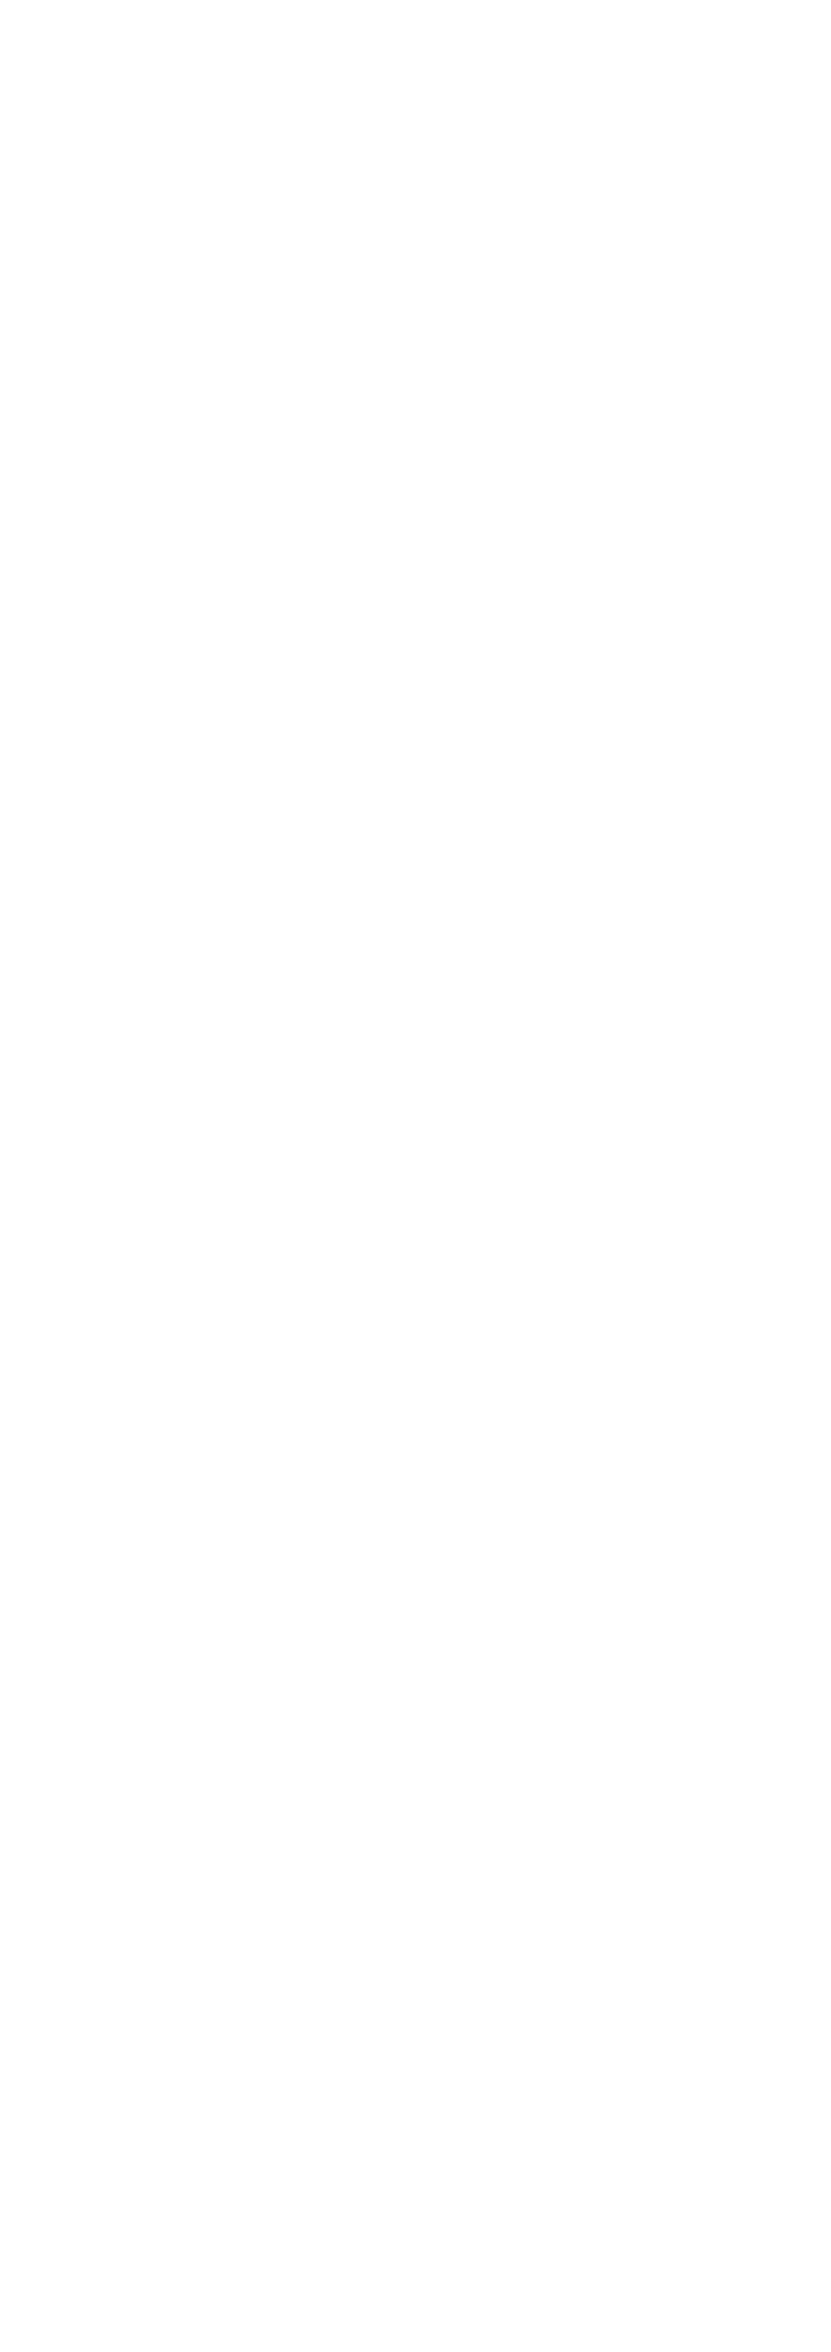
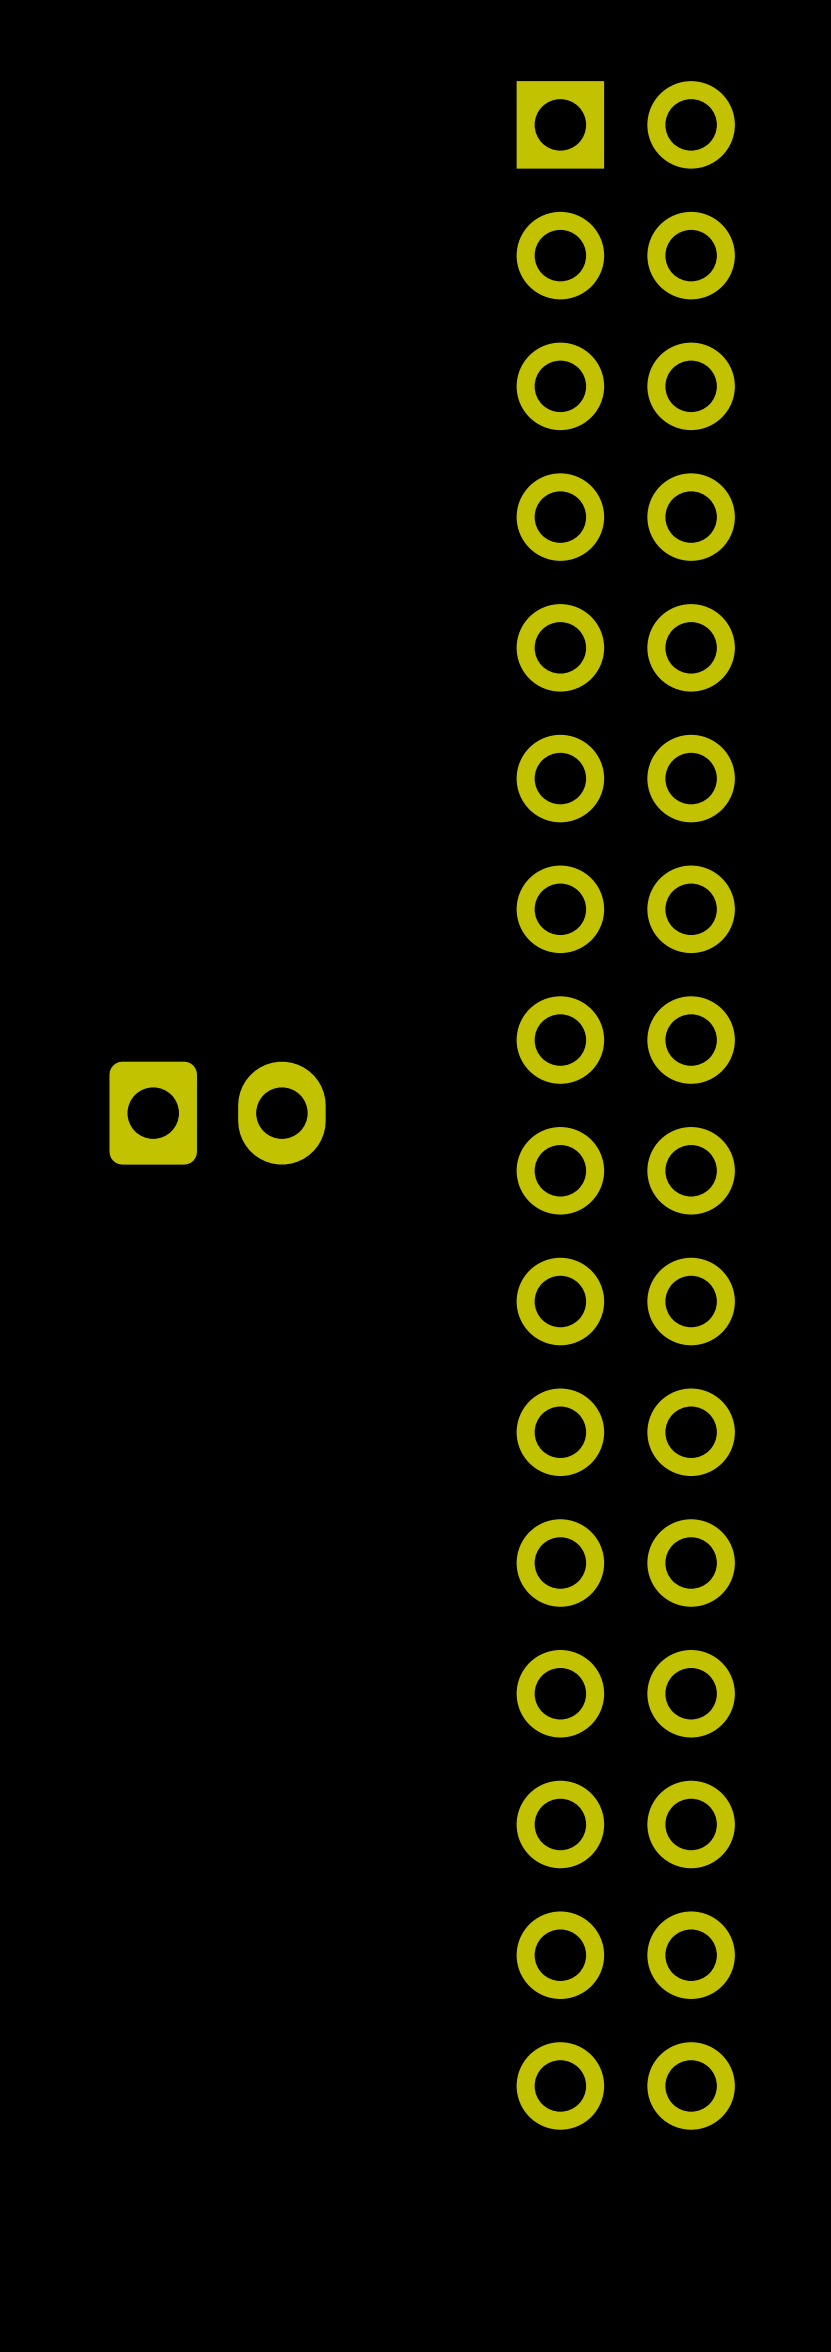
part: none -> (625, 1105)
part: none -> (217, 1113)

